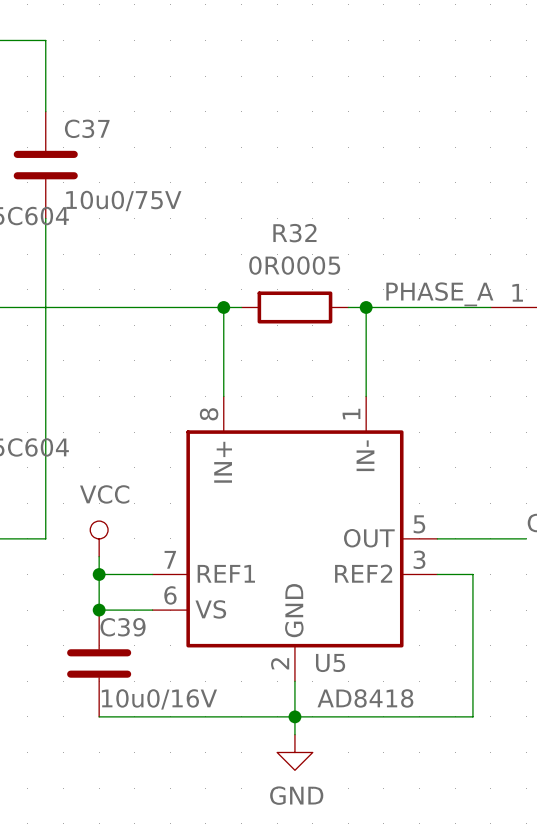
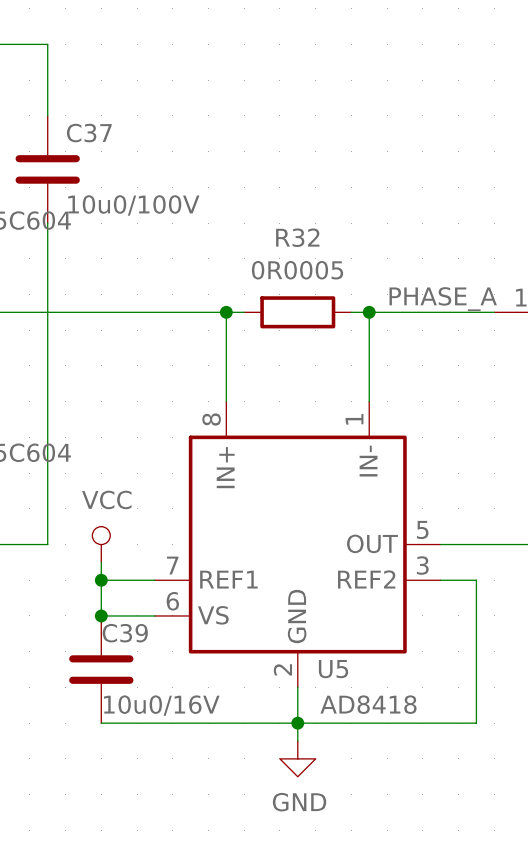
C37 value: 10u0/75V (123, 200) -> 10u0/100V (133, 205)

